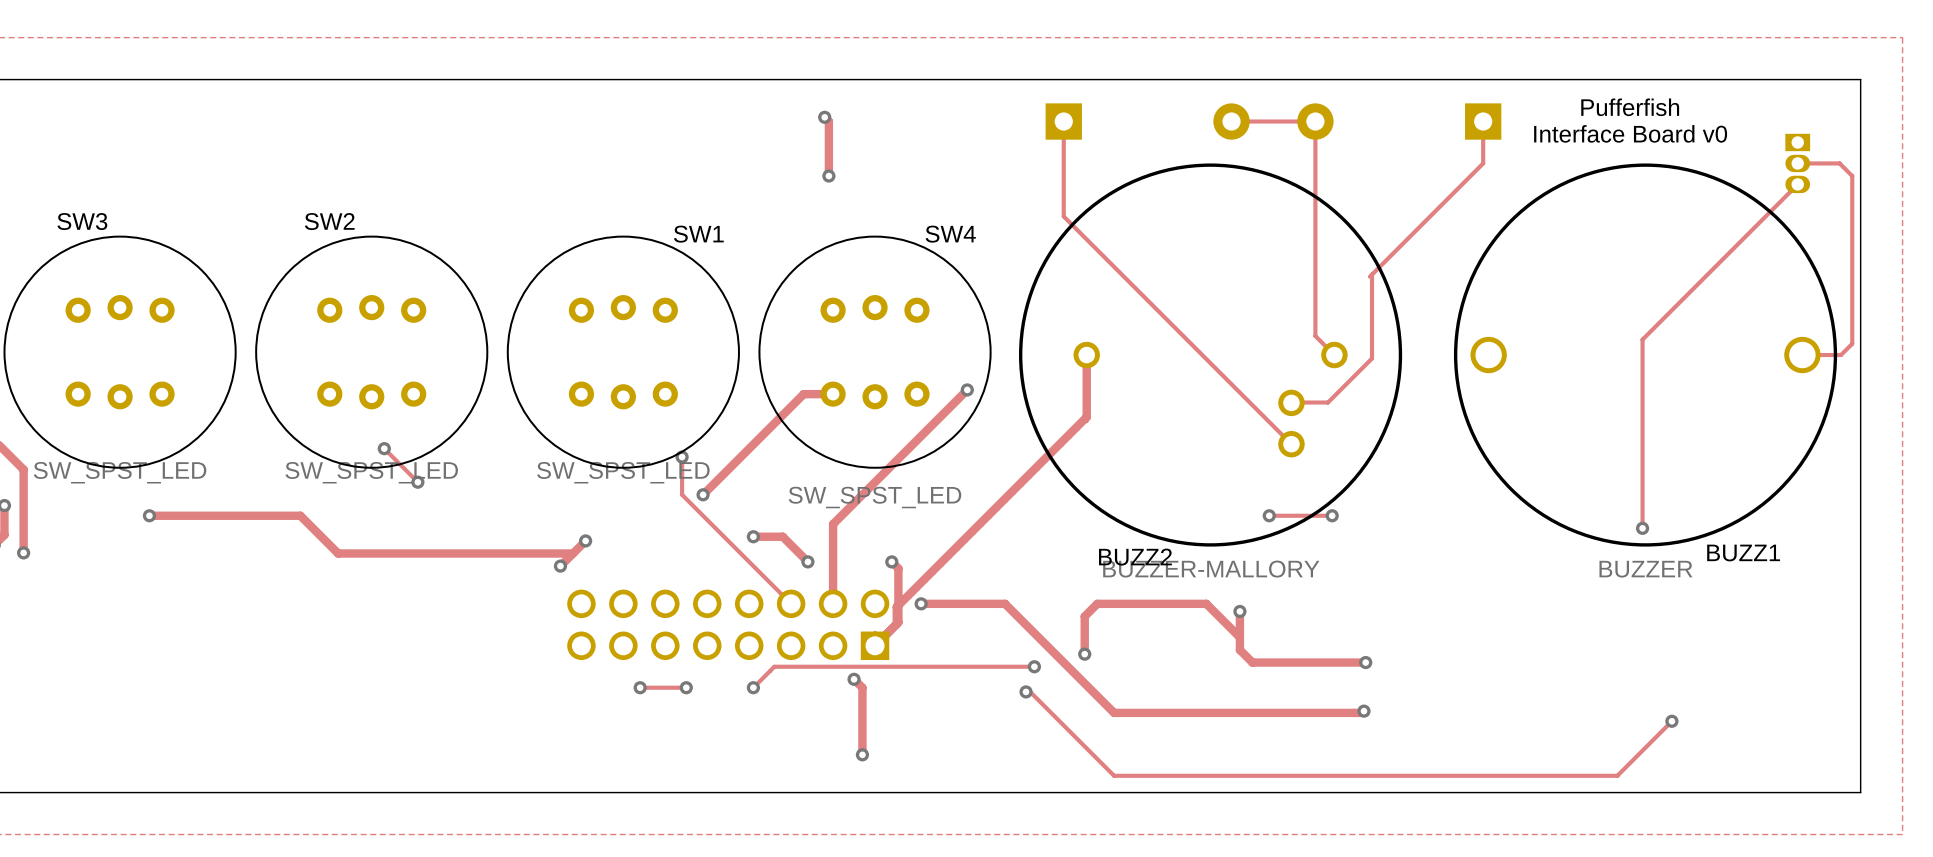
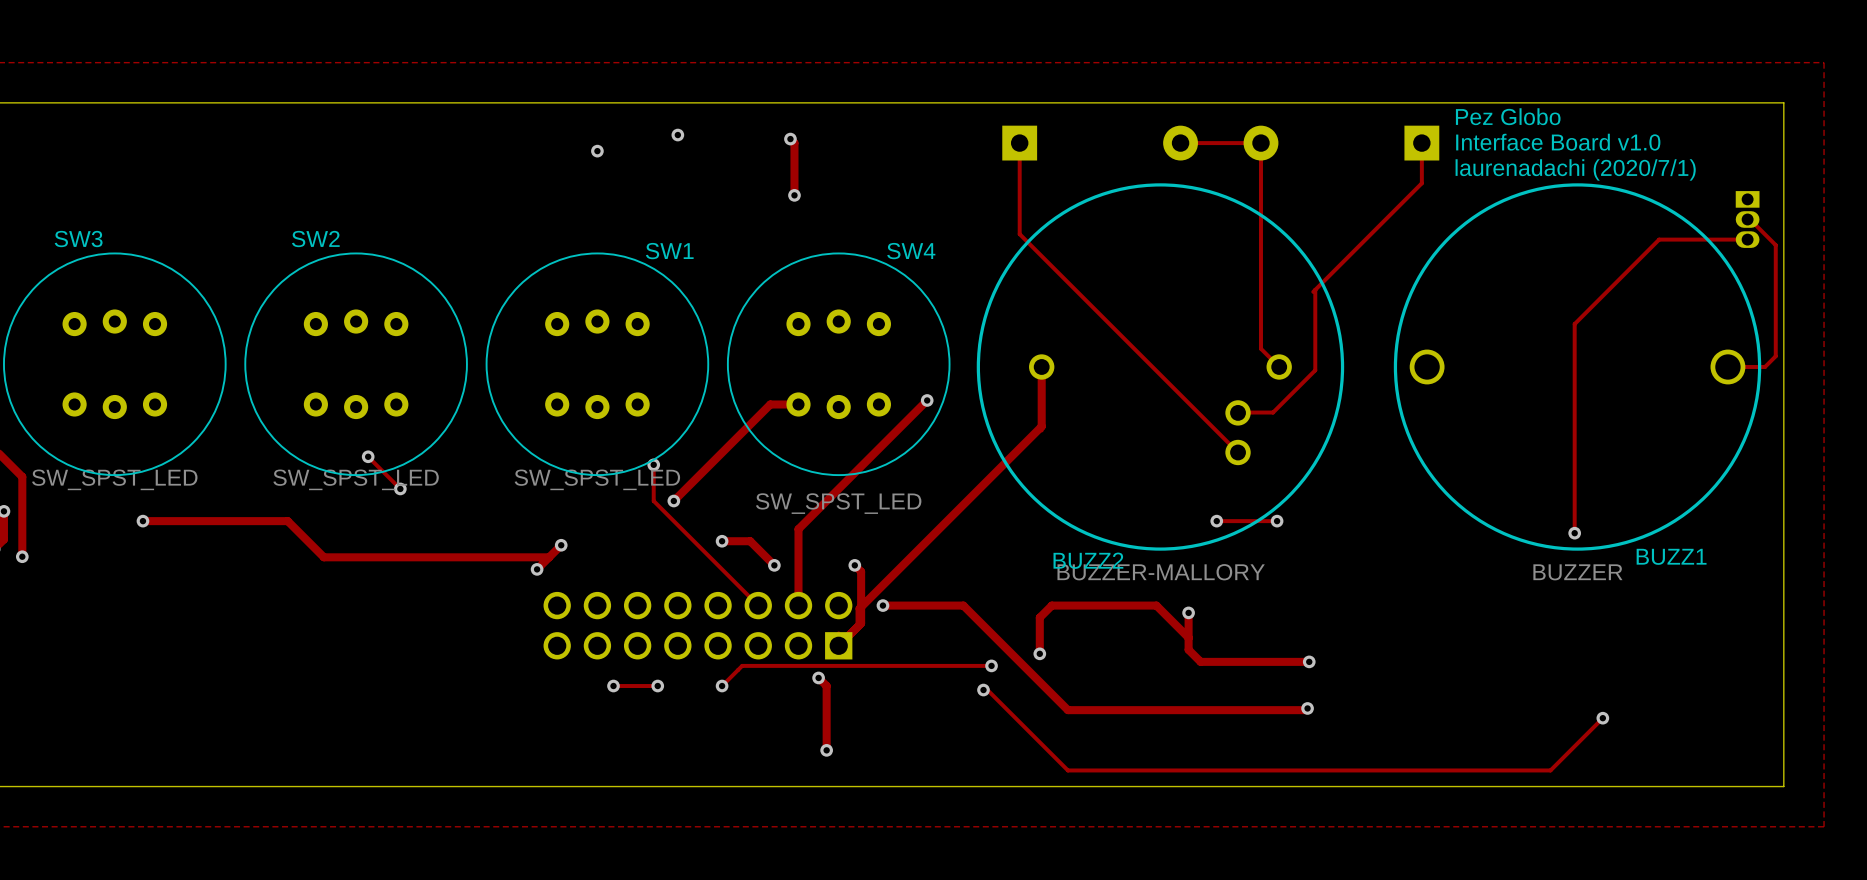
text: none -> Pez Globo (1508, 116)
text: Pufferfish (1630, 107) -> none
via: none -> (677, 135)
via: none -> (597, 151)
text: Interface Board v0 (1630, 133) -> Interface Board v1.0 (1558, 142)
text: none -> laurenadachi (2020/7/1) (1575, 169)
track: (1797, 163) (1839, 163) (1852, 176) (1852, 227) -> (1747, 219) (1750, 219) (1775, 245)
part position: (1797, 163) -> (1747, 219)
track: (1797, 184) (1642, 339) -> (1747, 239) (1659, 239) (1574, 324) (1574, 352)

